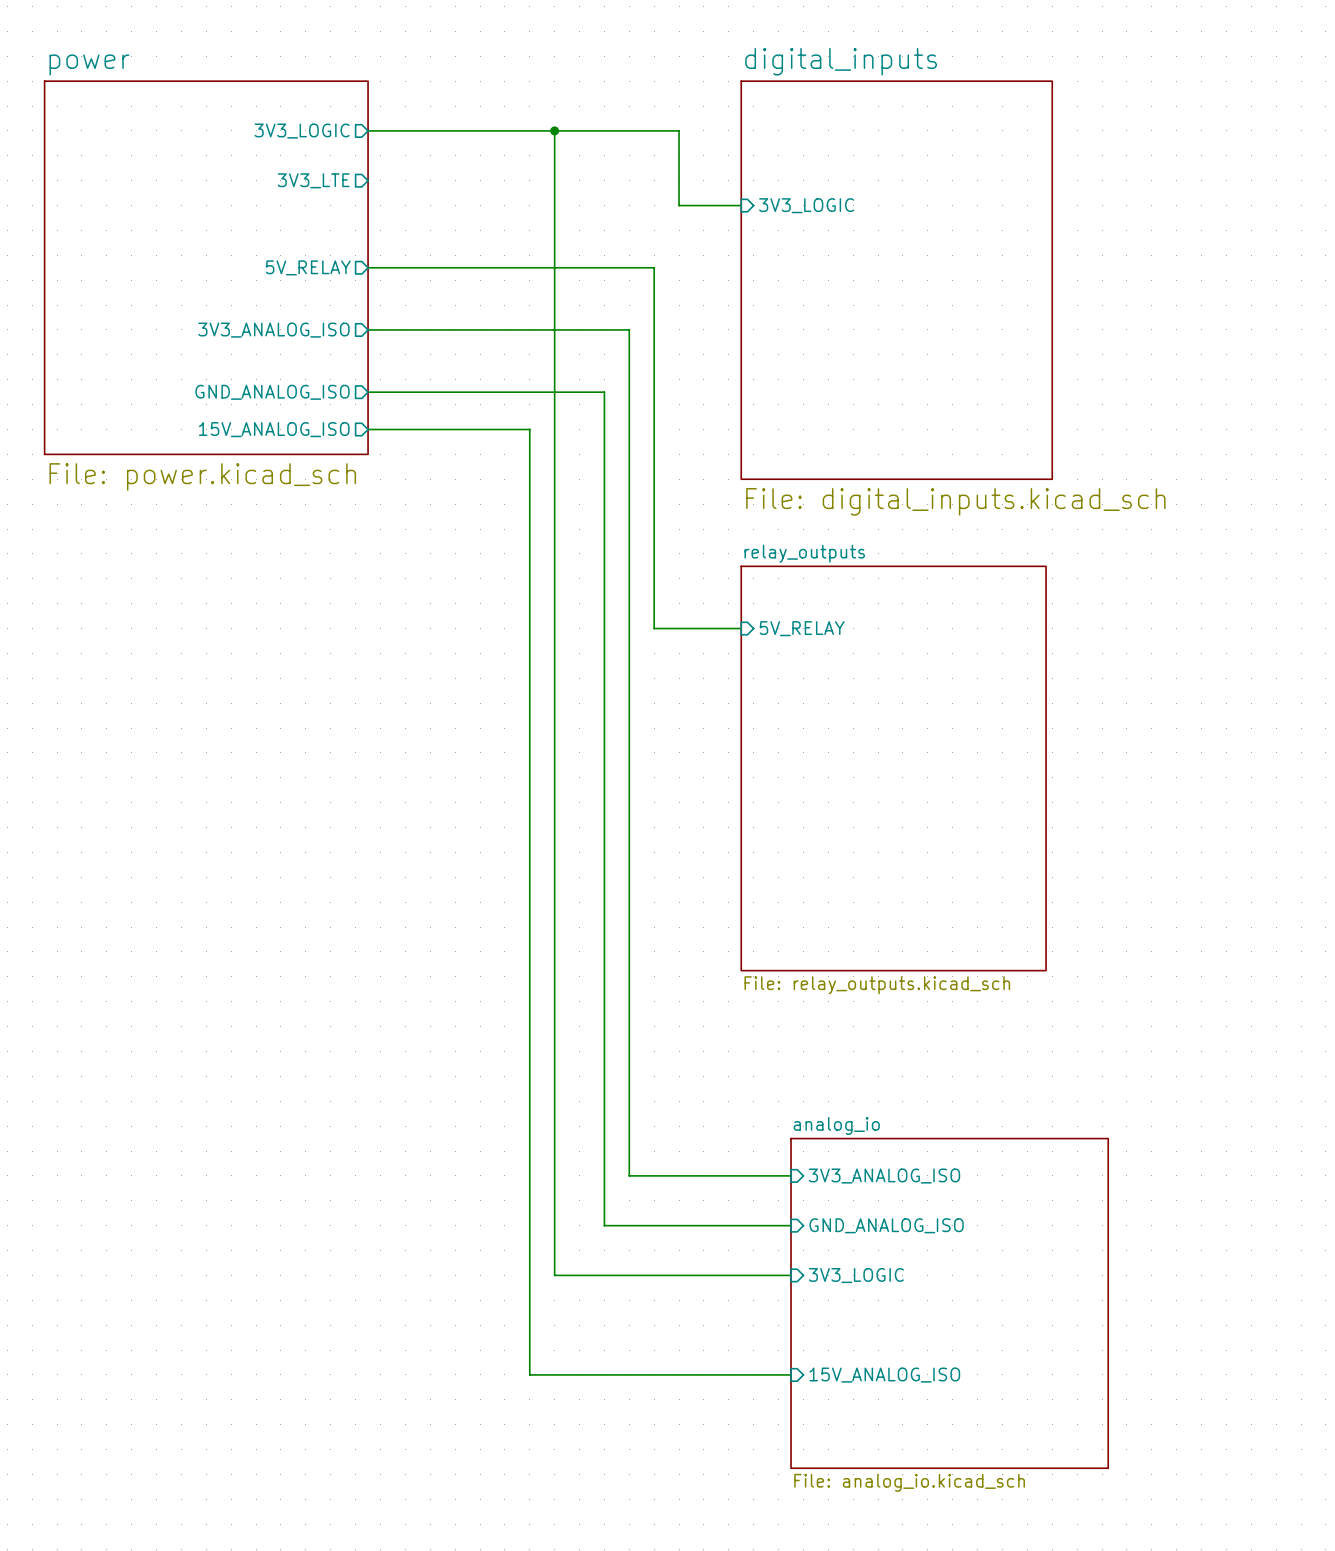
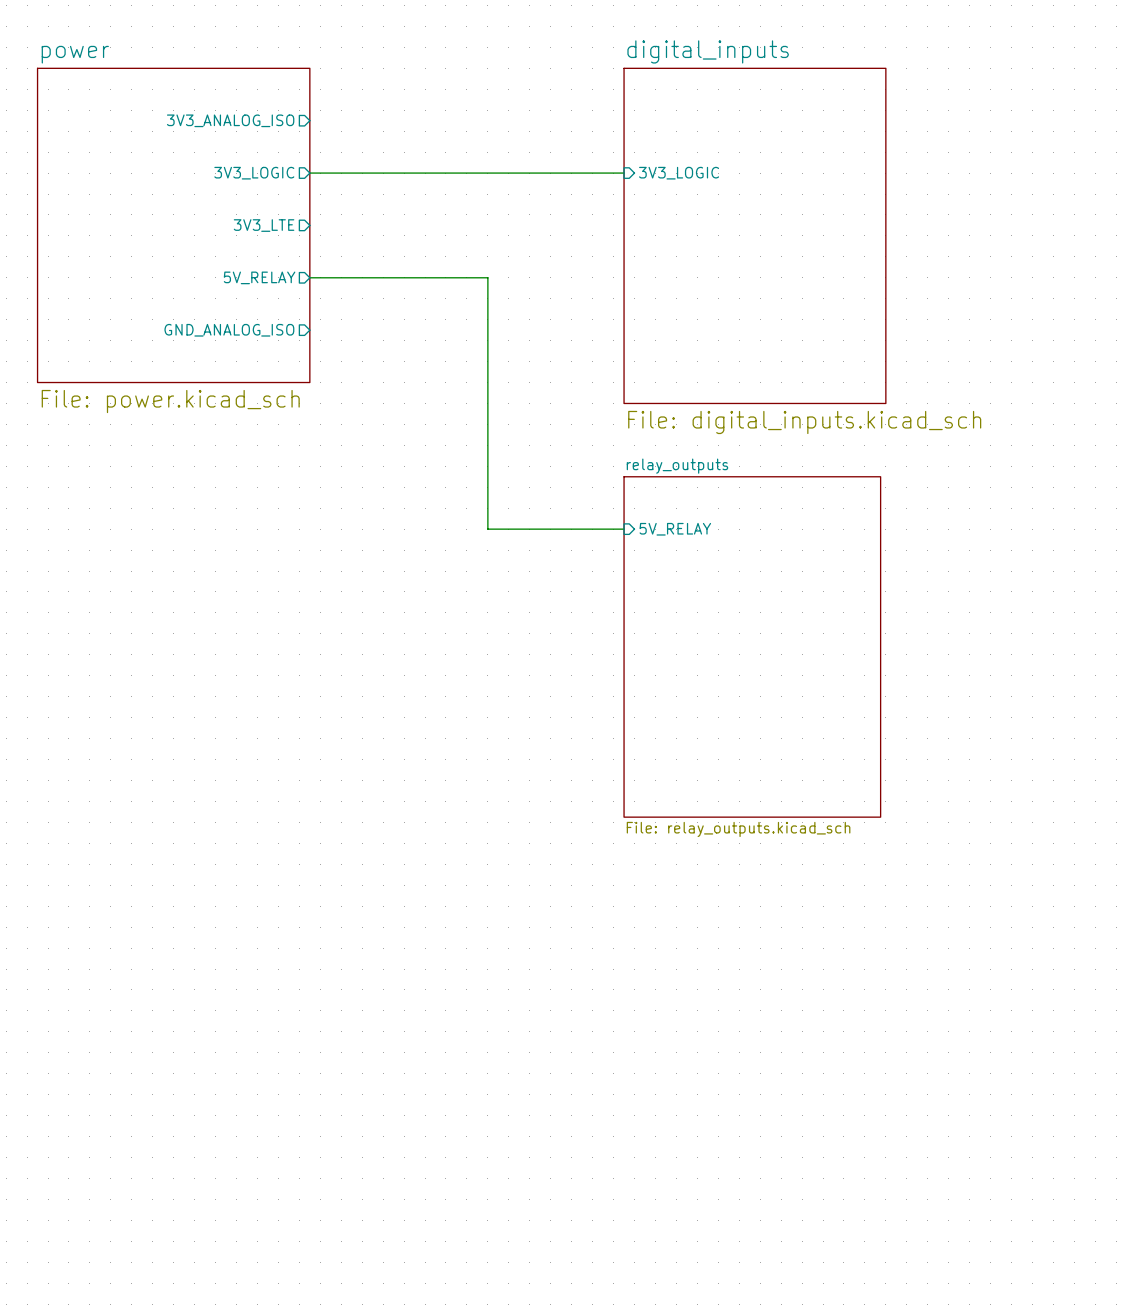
wire: (368, 130) (679, 130) (679, 205) -> (309, 173) (571, 173)
wire: (554, 130) (554, 1275) (791, 1275) -> none
junction: (554, 130) -> none
sheet pin position: 3V3_LOGIC (302, 131) -> 3V3_LOGIC (254, 173)
sheet pin: none -> 3V3_ANALOG_ISO (230, 120)
sheet pin: 3V3_LTE (313, 180) -> none
sheet pin: 5V_RELAY (308, 267) -> 3V3_LTE (264, 225)
wire: (368, 267) (654, 267) (654, 628) -> (487, 277) (487, 529) (550, 529)
wire: (579, 329) (629, 329) (629, 1175) (791, 1175) -> none
sheet pin: 3V3_ANALOG_ISO (273, 330) -> 5V_RELAY (259, 277)
wire: (368, 392) (604, 392) (604, 1225) (791, 1225) -> none
sheet pin: 15V_ANALOG_ISO (274, 429) -> none
wire: (368, 429) (529, 429) (529, 1374) (791, 1374) -> none
sheet pin: 3V3_ANALOG_ISO (884, 1176) -> none
sheet pin: GND_ANALOG_ISO (886, 1225) -> none
sheet pin: 3V3_LOGIC (856, 1275) -> none
sheet analog_io: File: analog_io.kicad_sch (949, 1303) -> none
sheet pin: 15V_ANALOG_ISO (884, 1375) -> none

